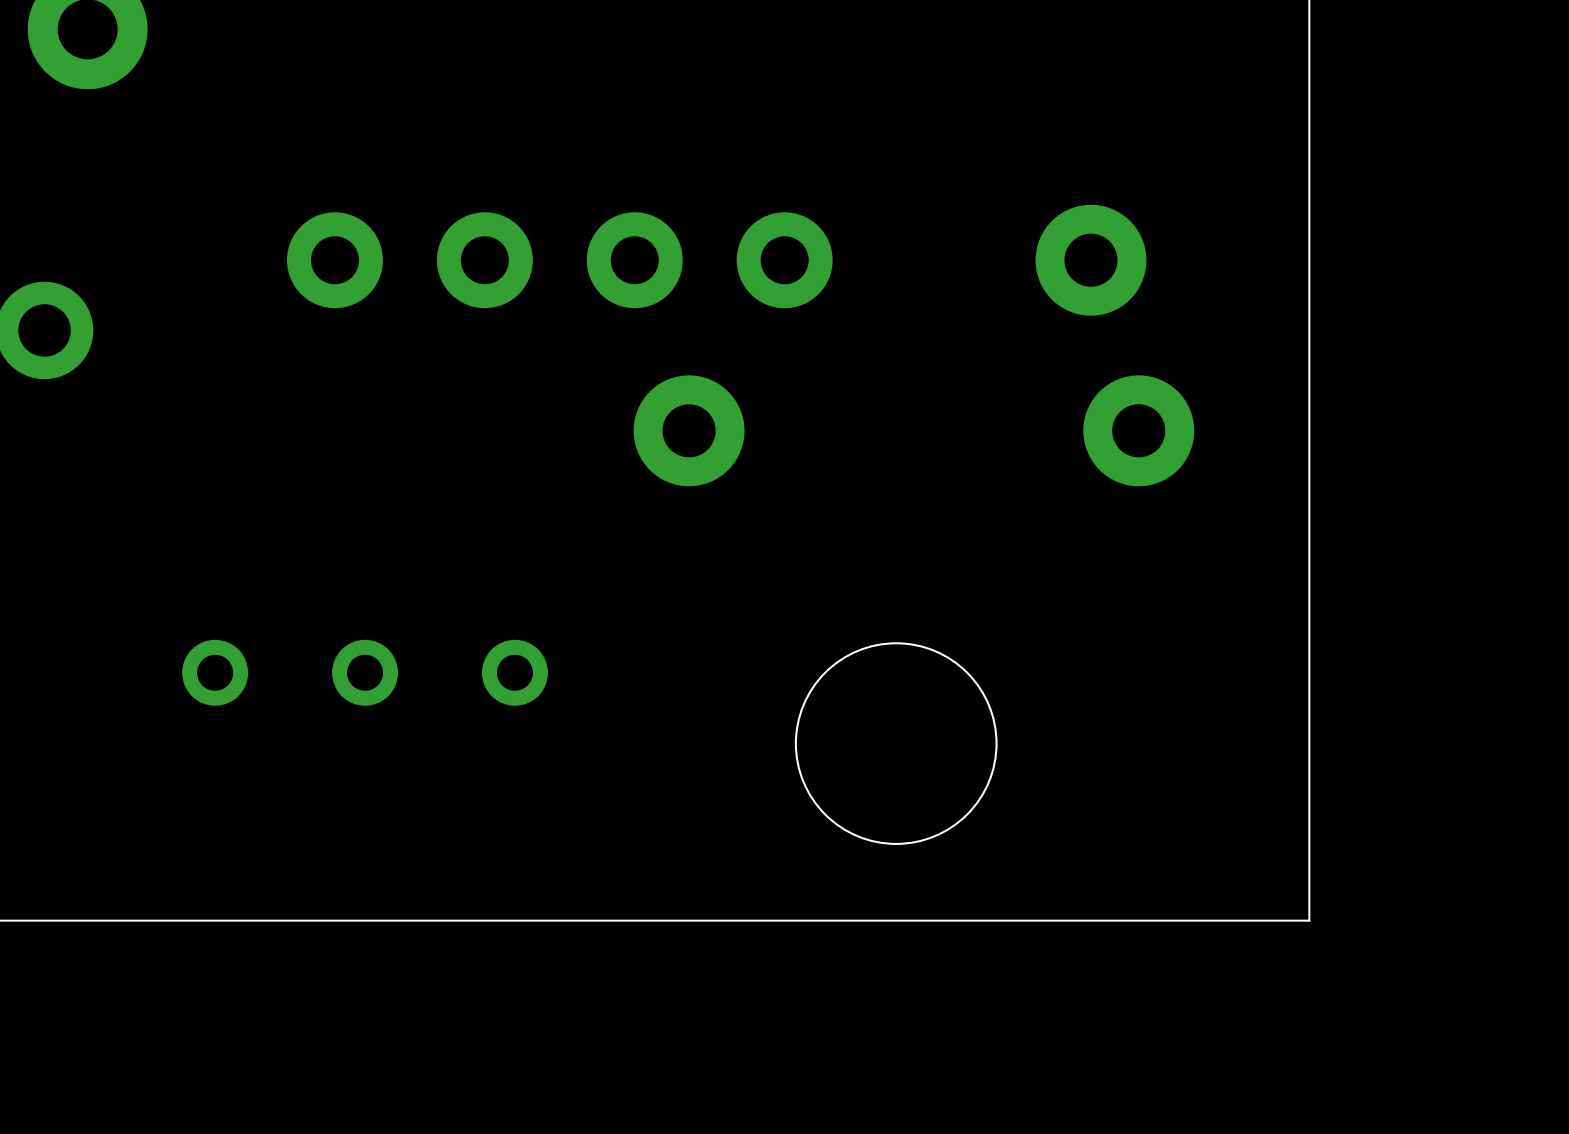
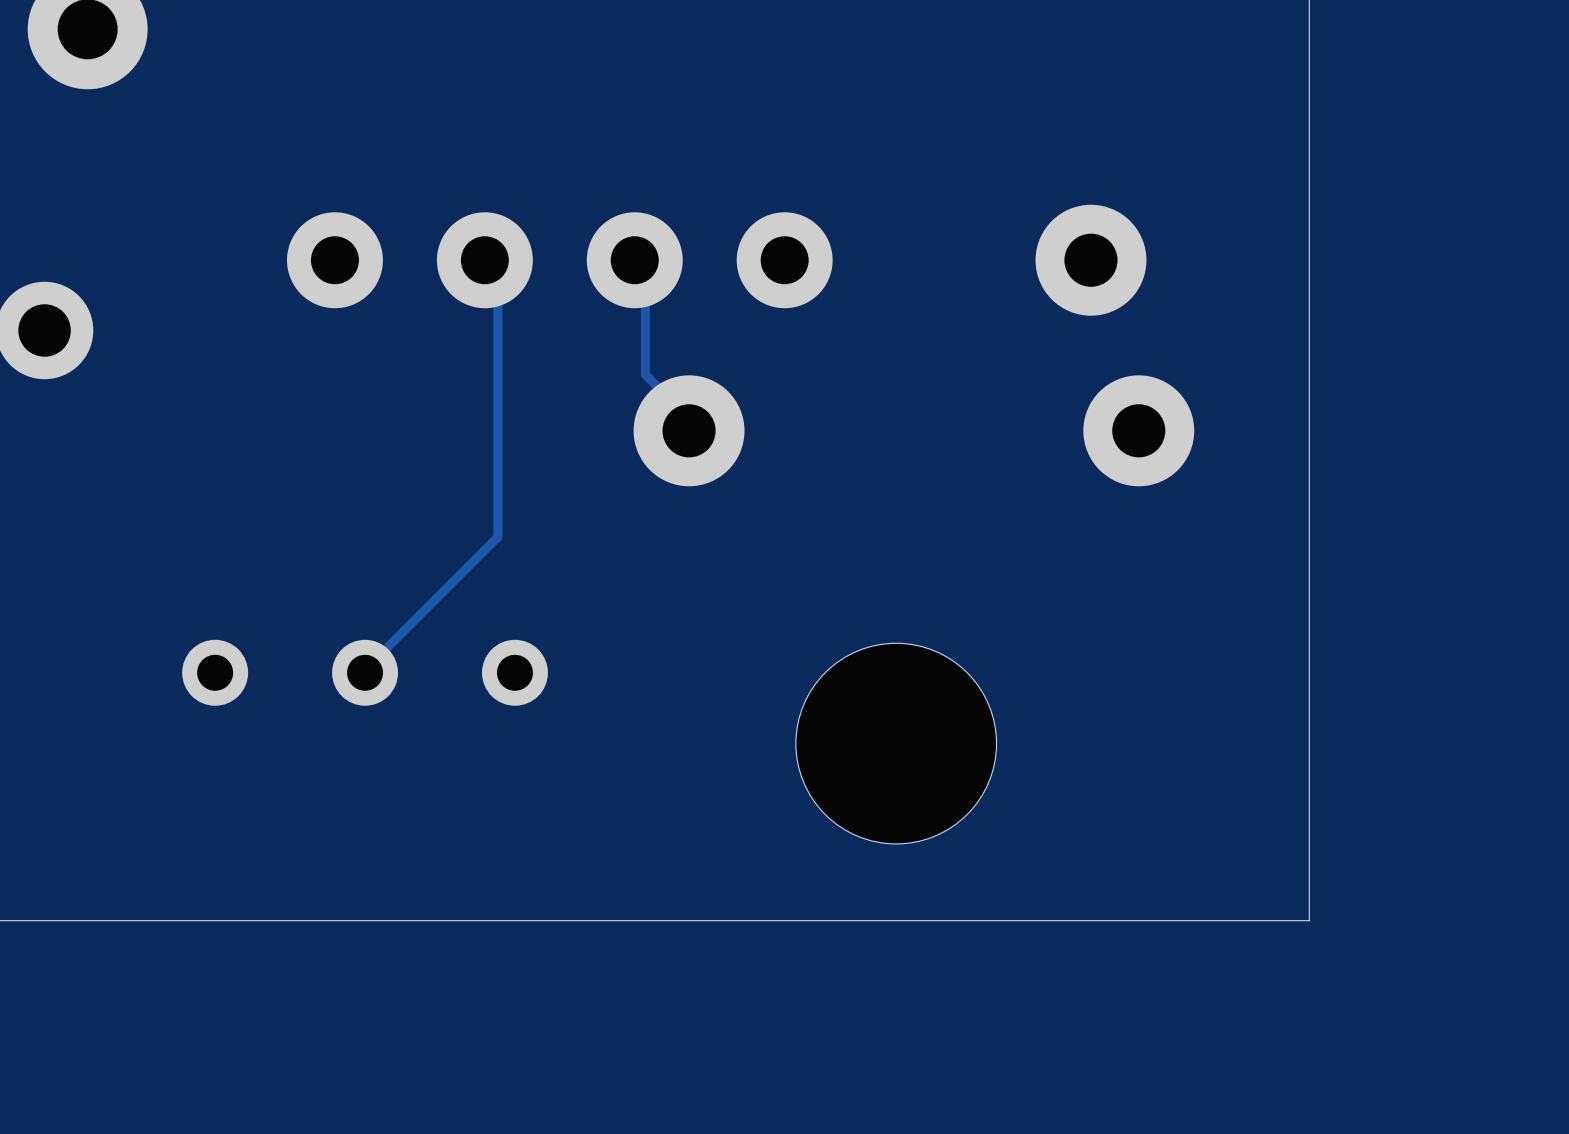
track: none -> (484, 260) (497, 271) (497, 537) (365, 669) (365, 672)
track: none -> (634, 260) (645, 271) (645, 374) (674, 404) (674, 419) (689, 430)

